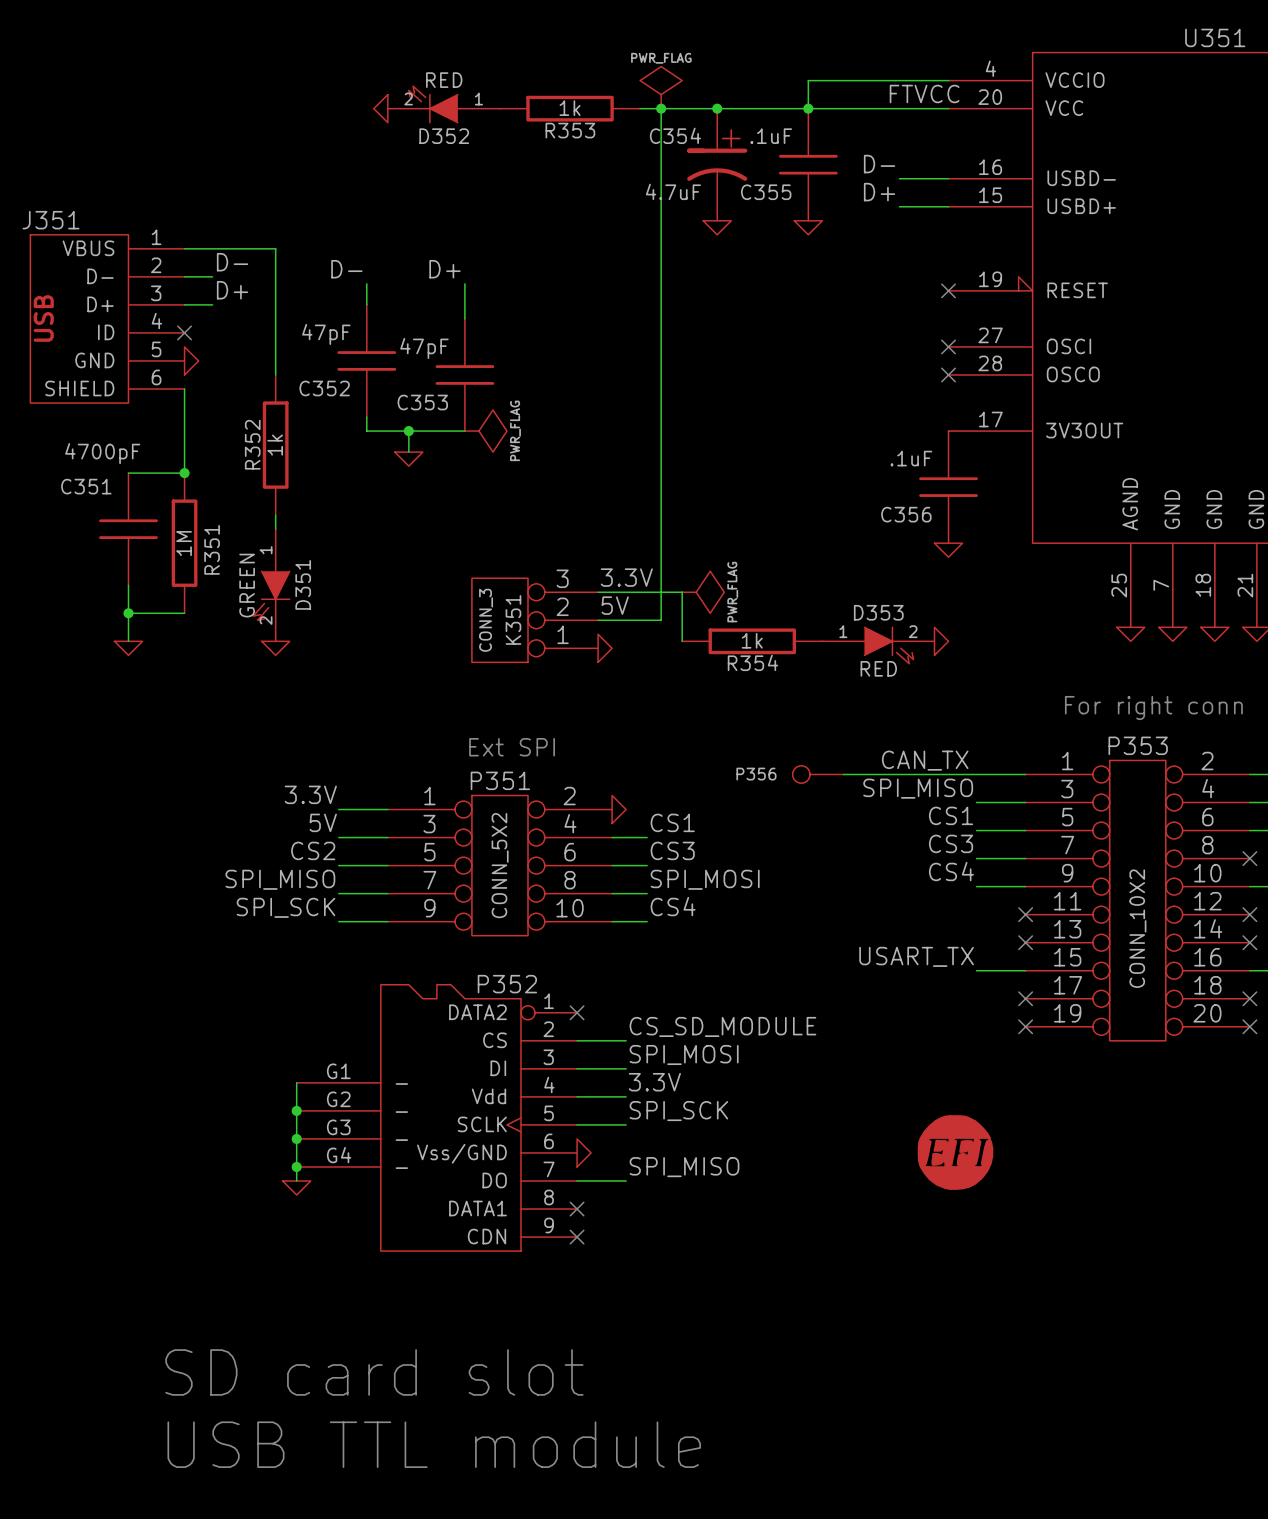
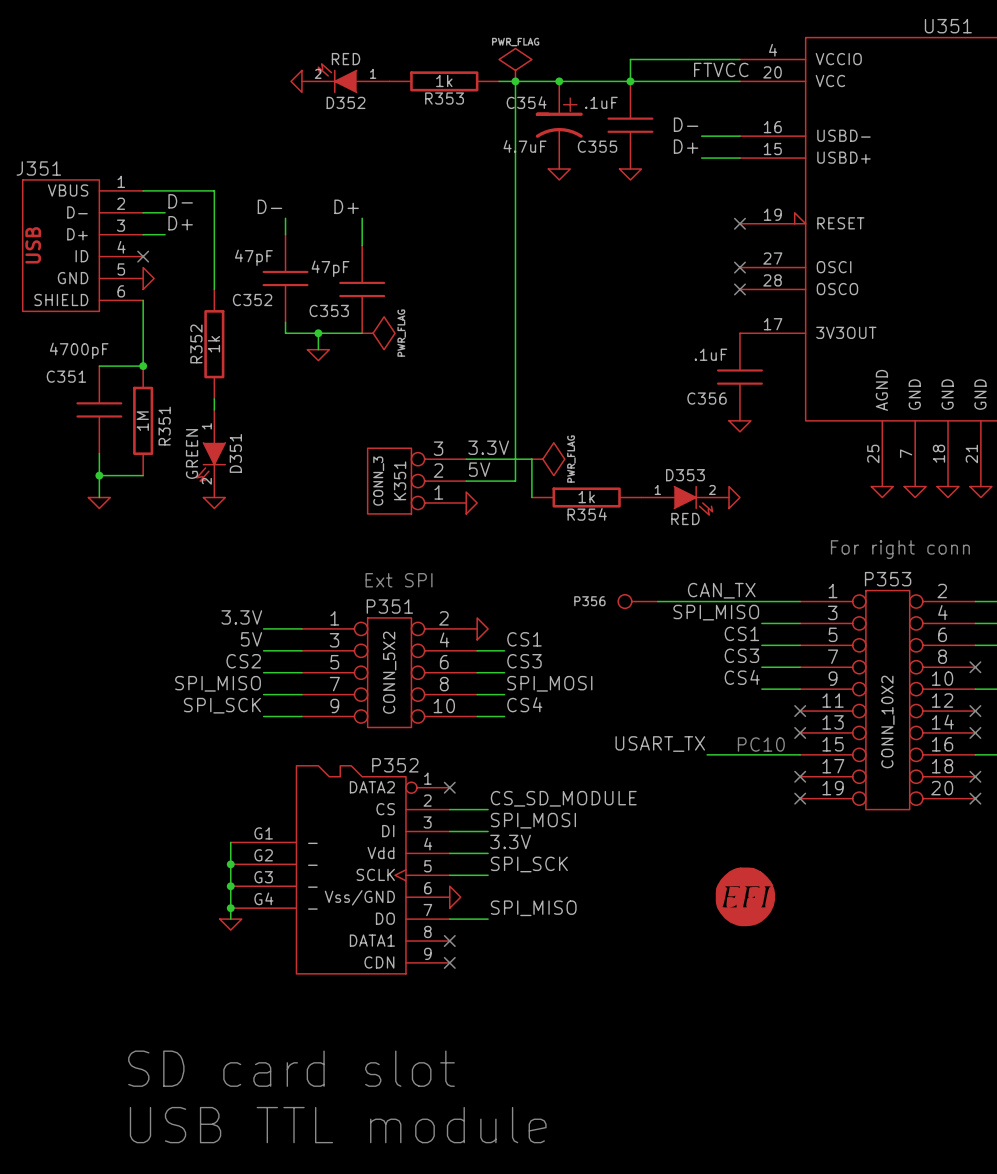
label position: USART_TX (916, 956) -> USART_TX (660, 744)
text: none -> PC10 (761, 744)
wire: none -> (707, 754) (761, 754)

